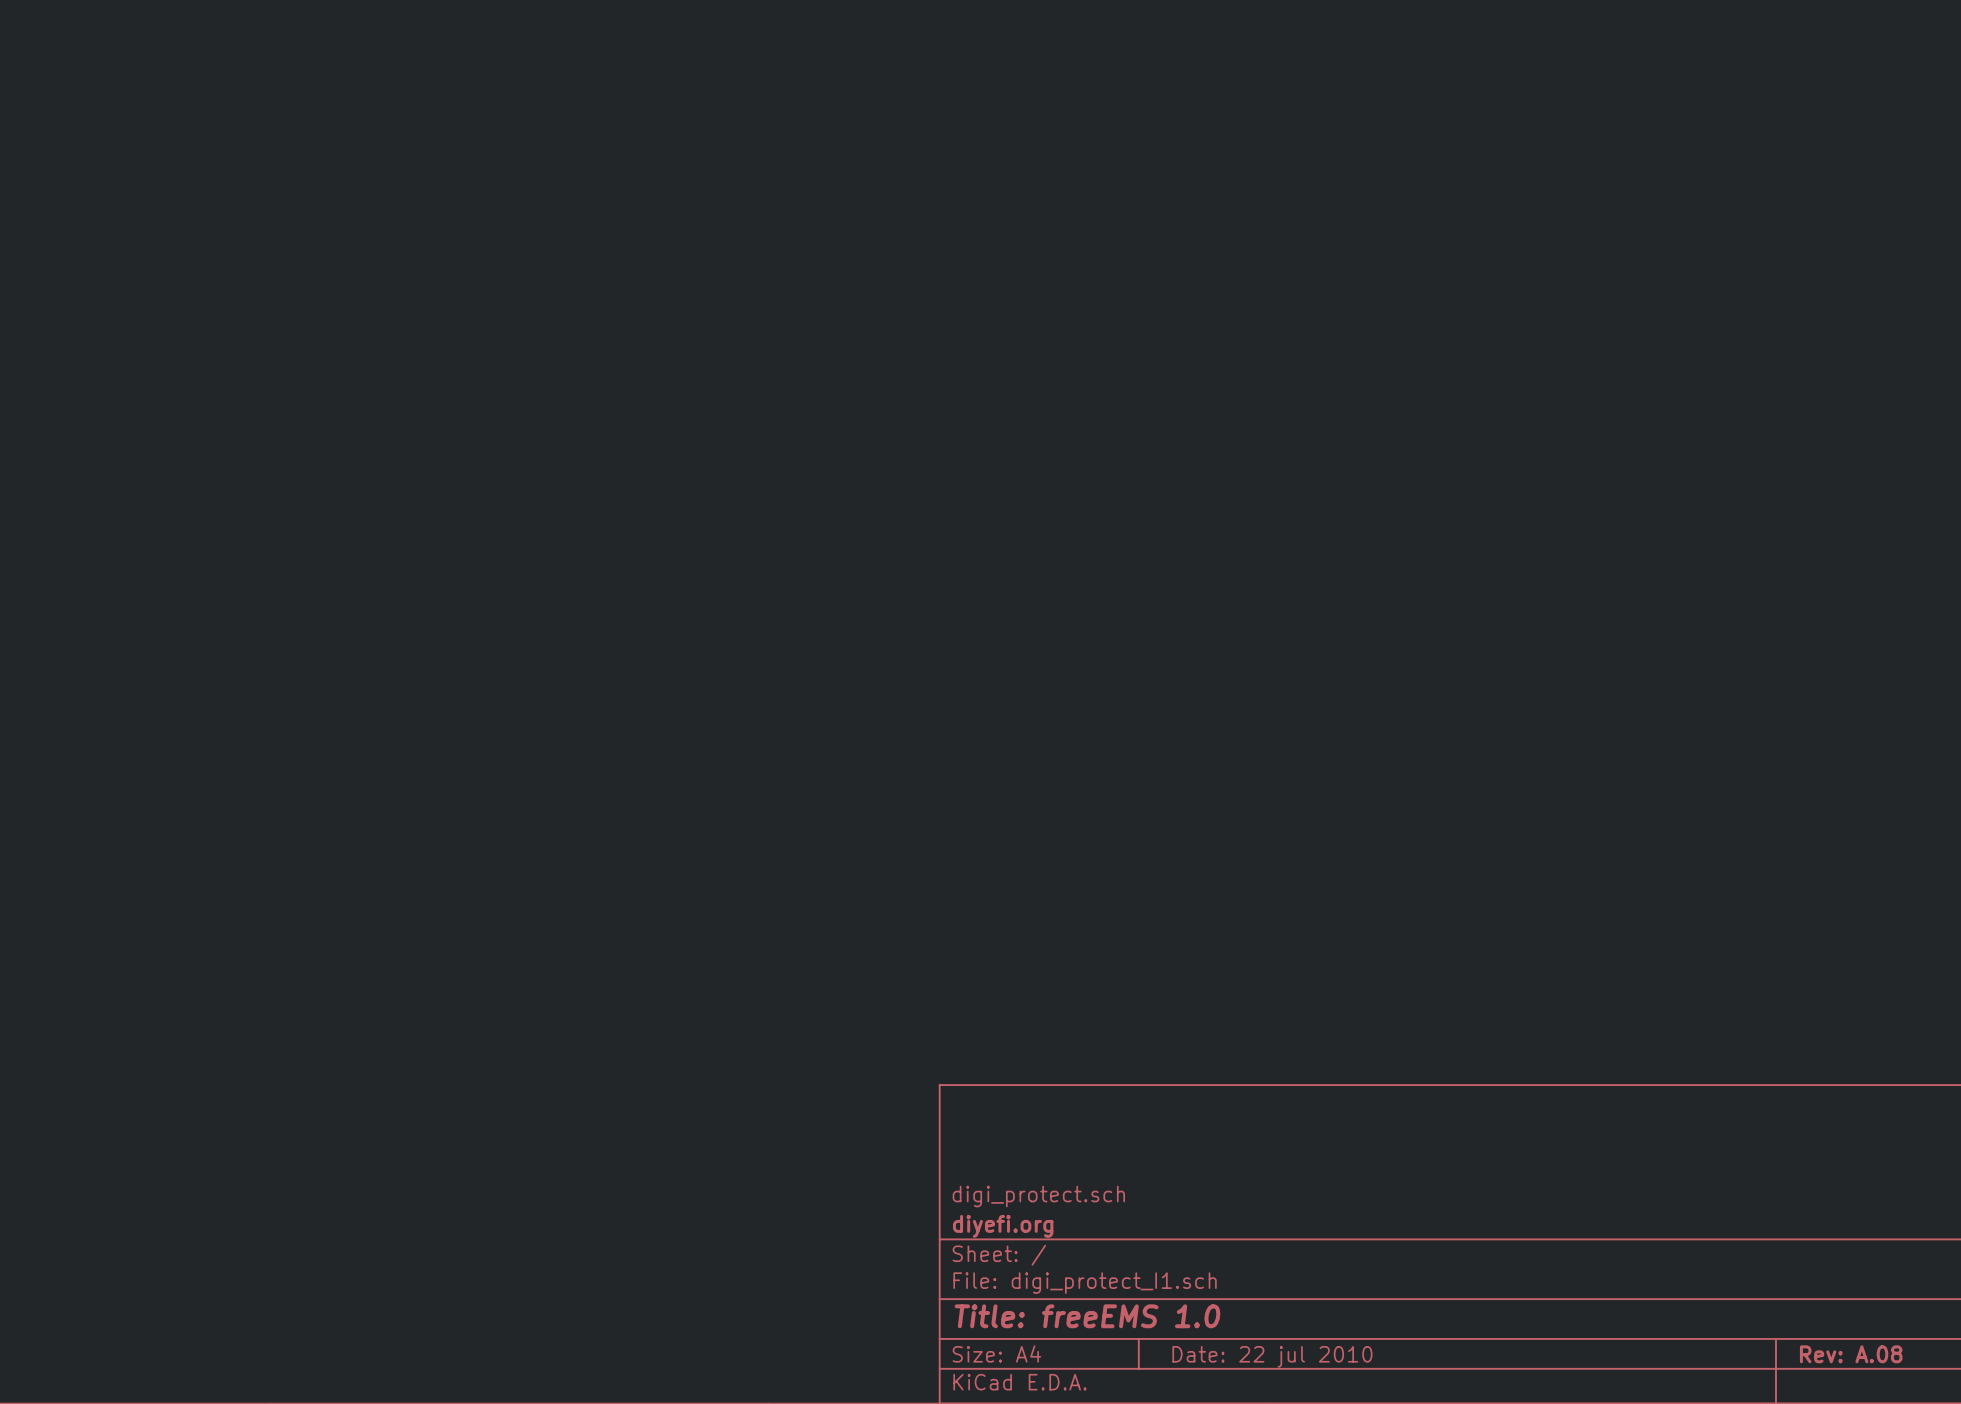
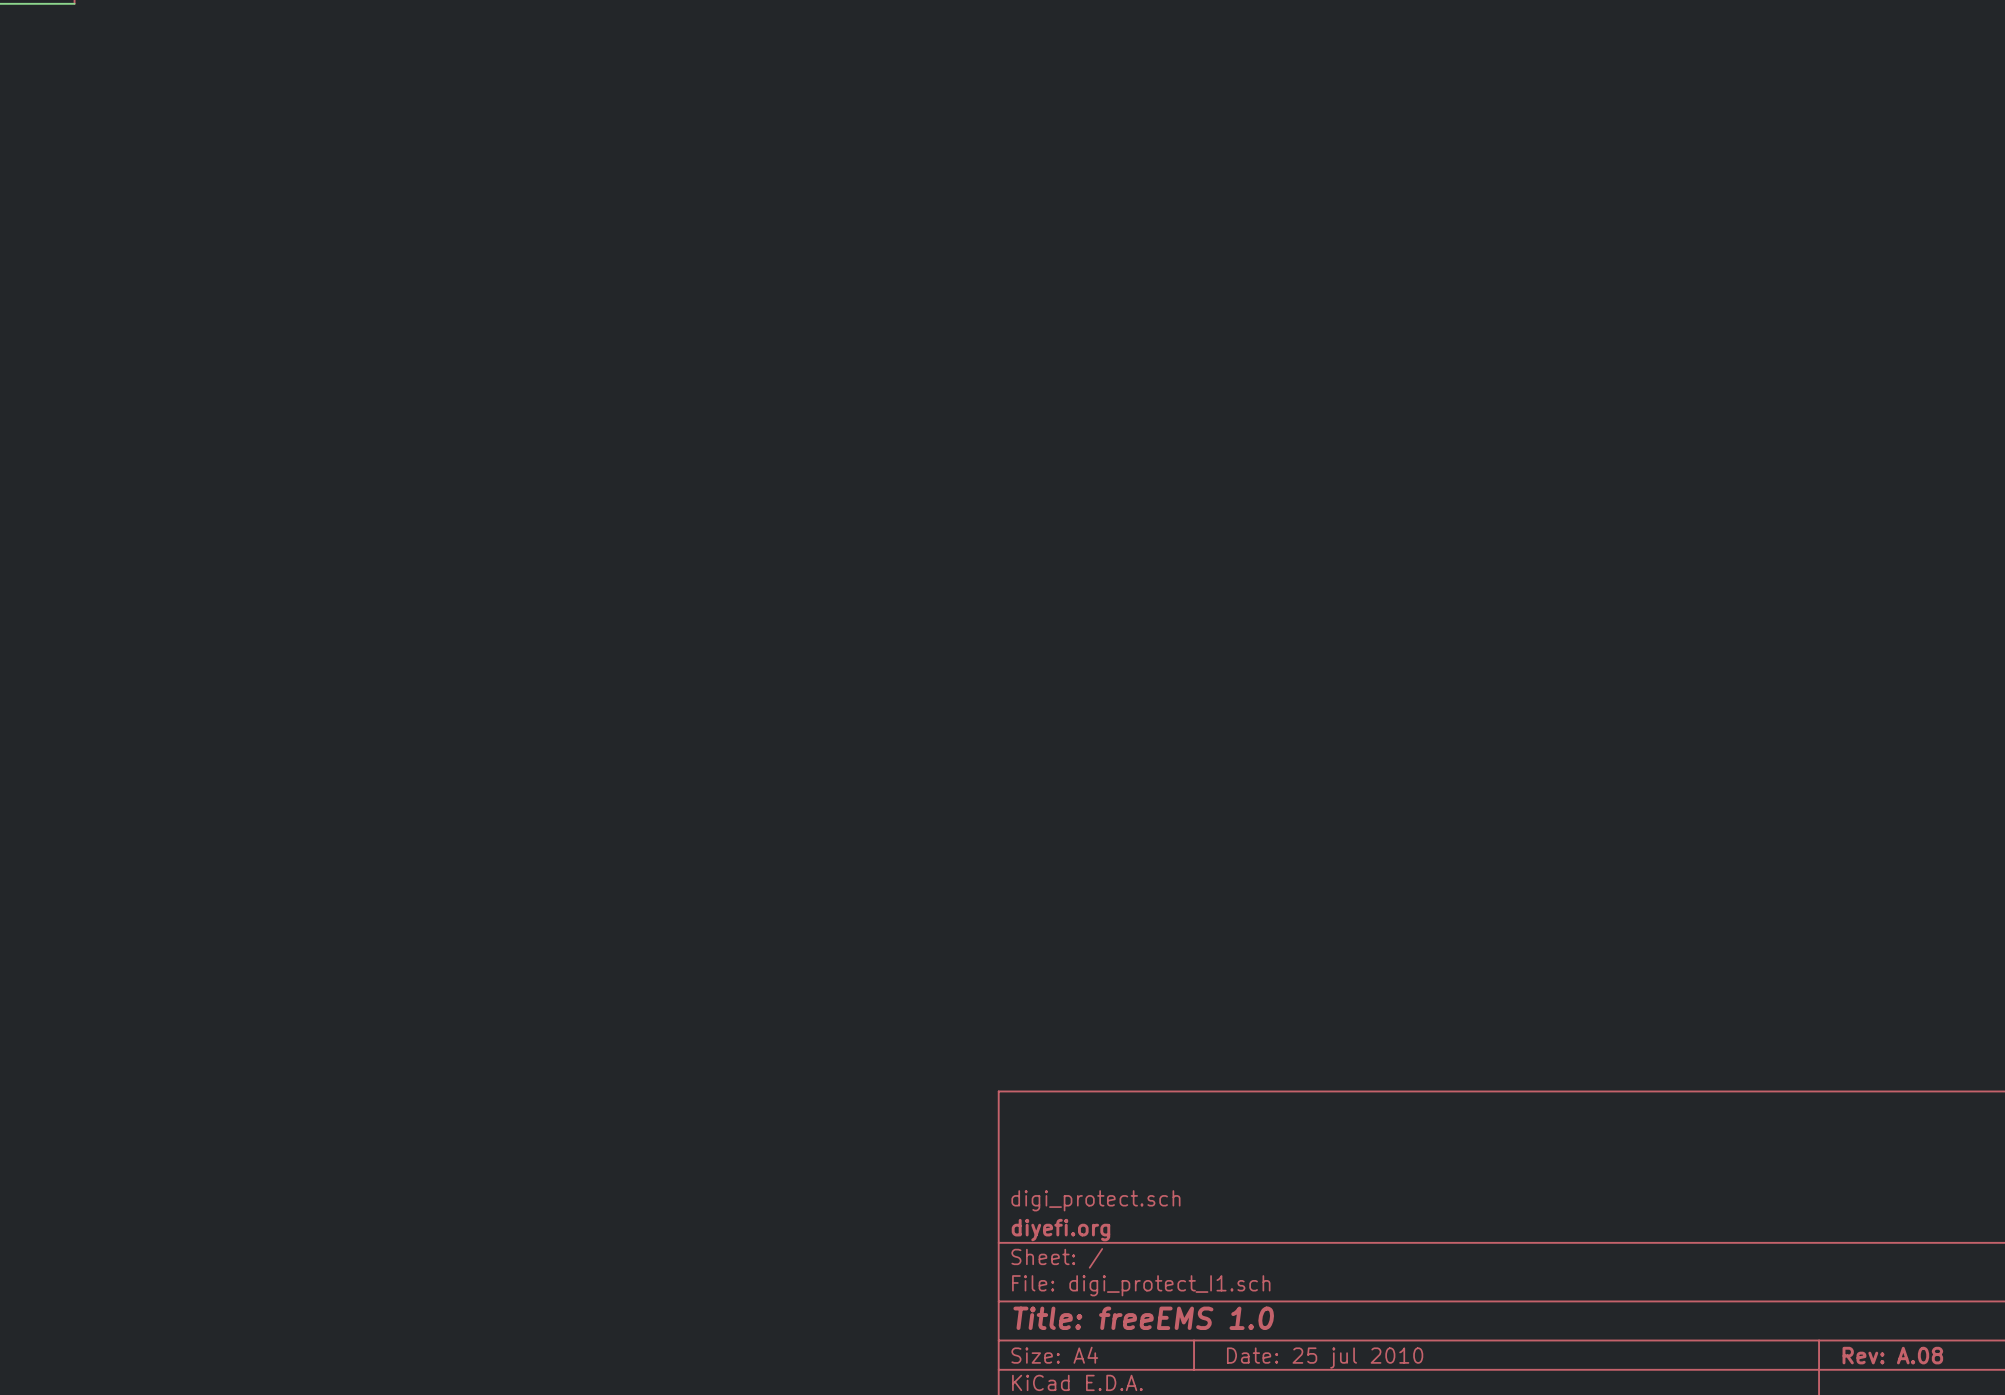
title block: Date: 22 jul 2010 (1272, 1356) -> Date: 25 jul 2010 (1325, 1358)

